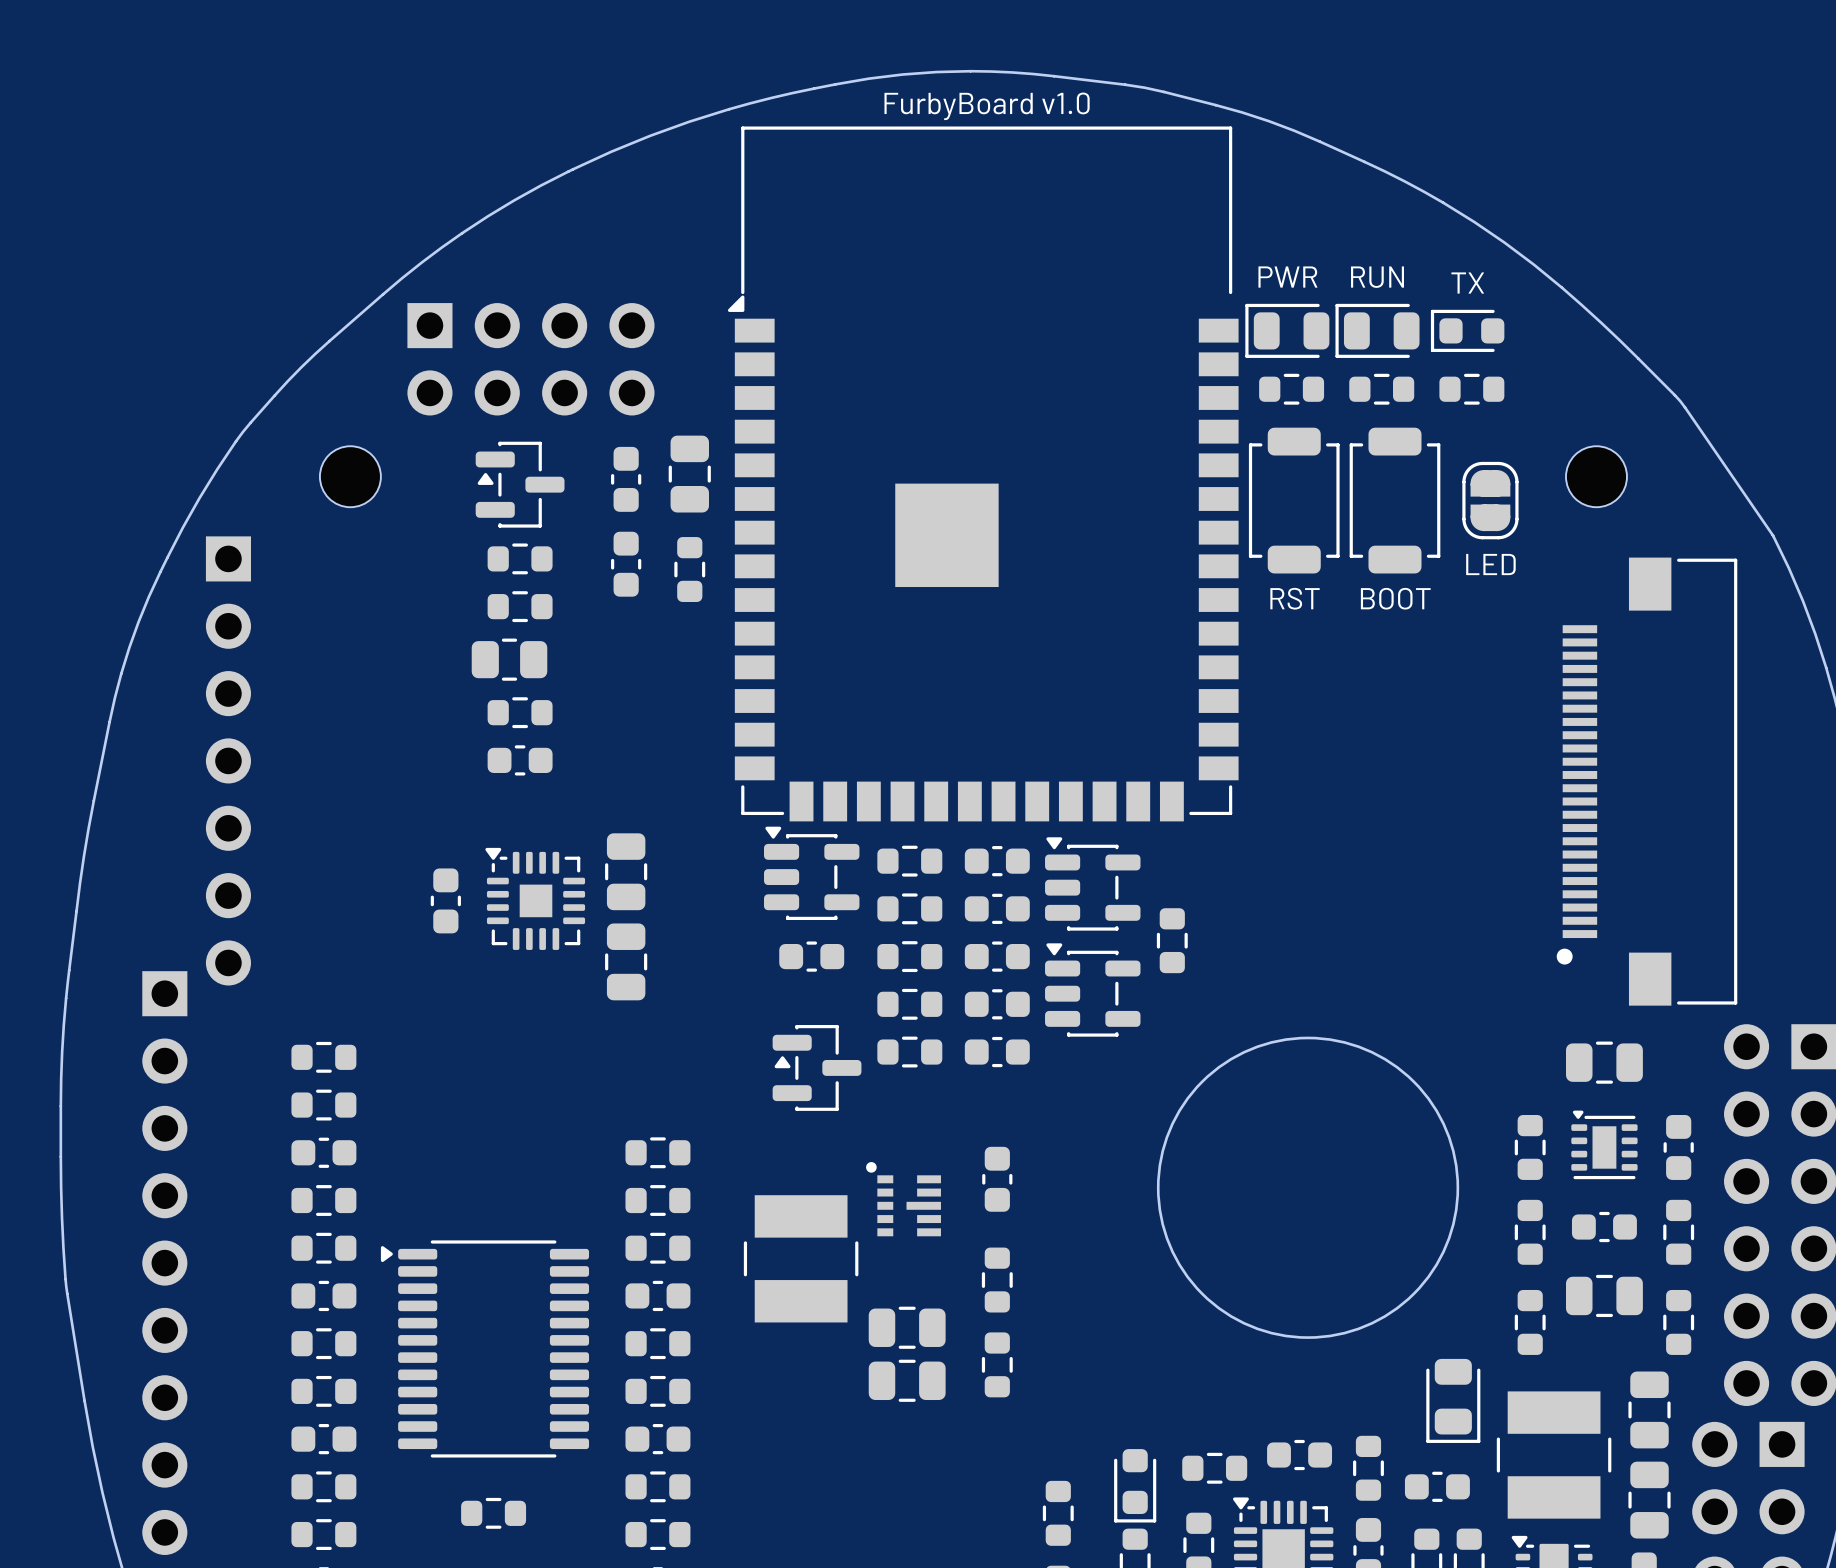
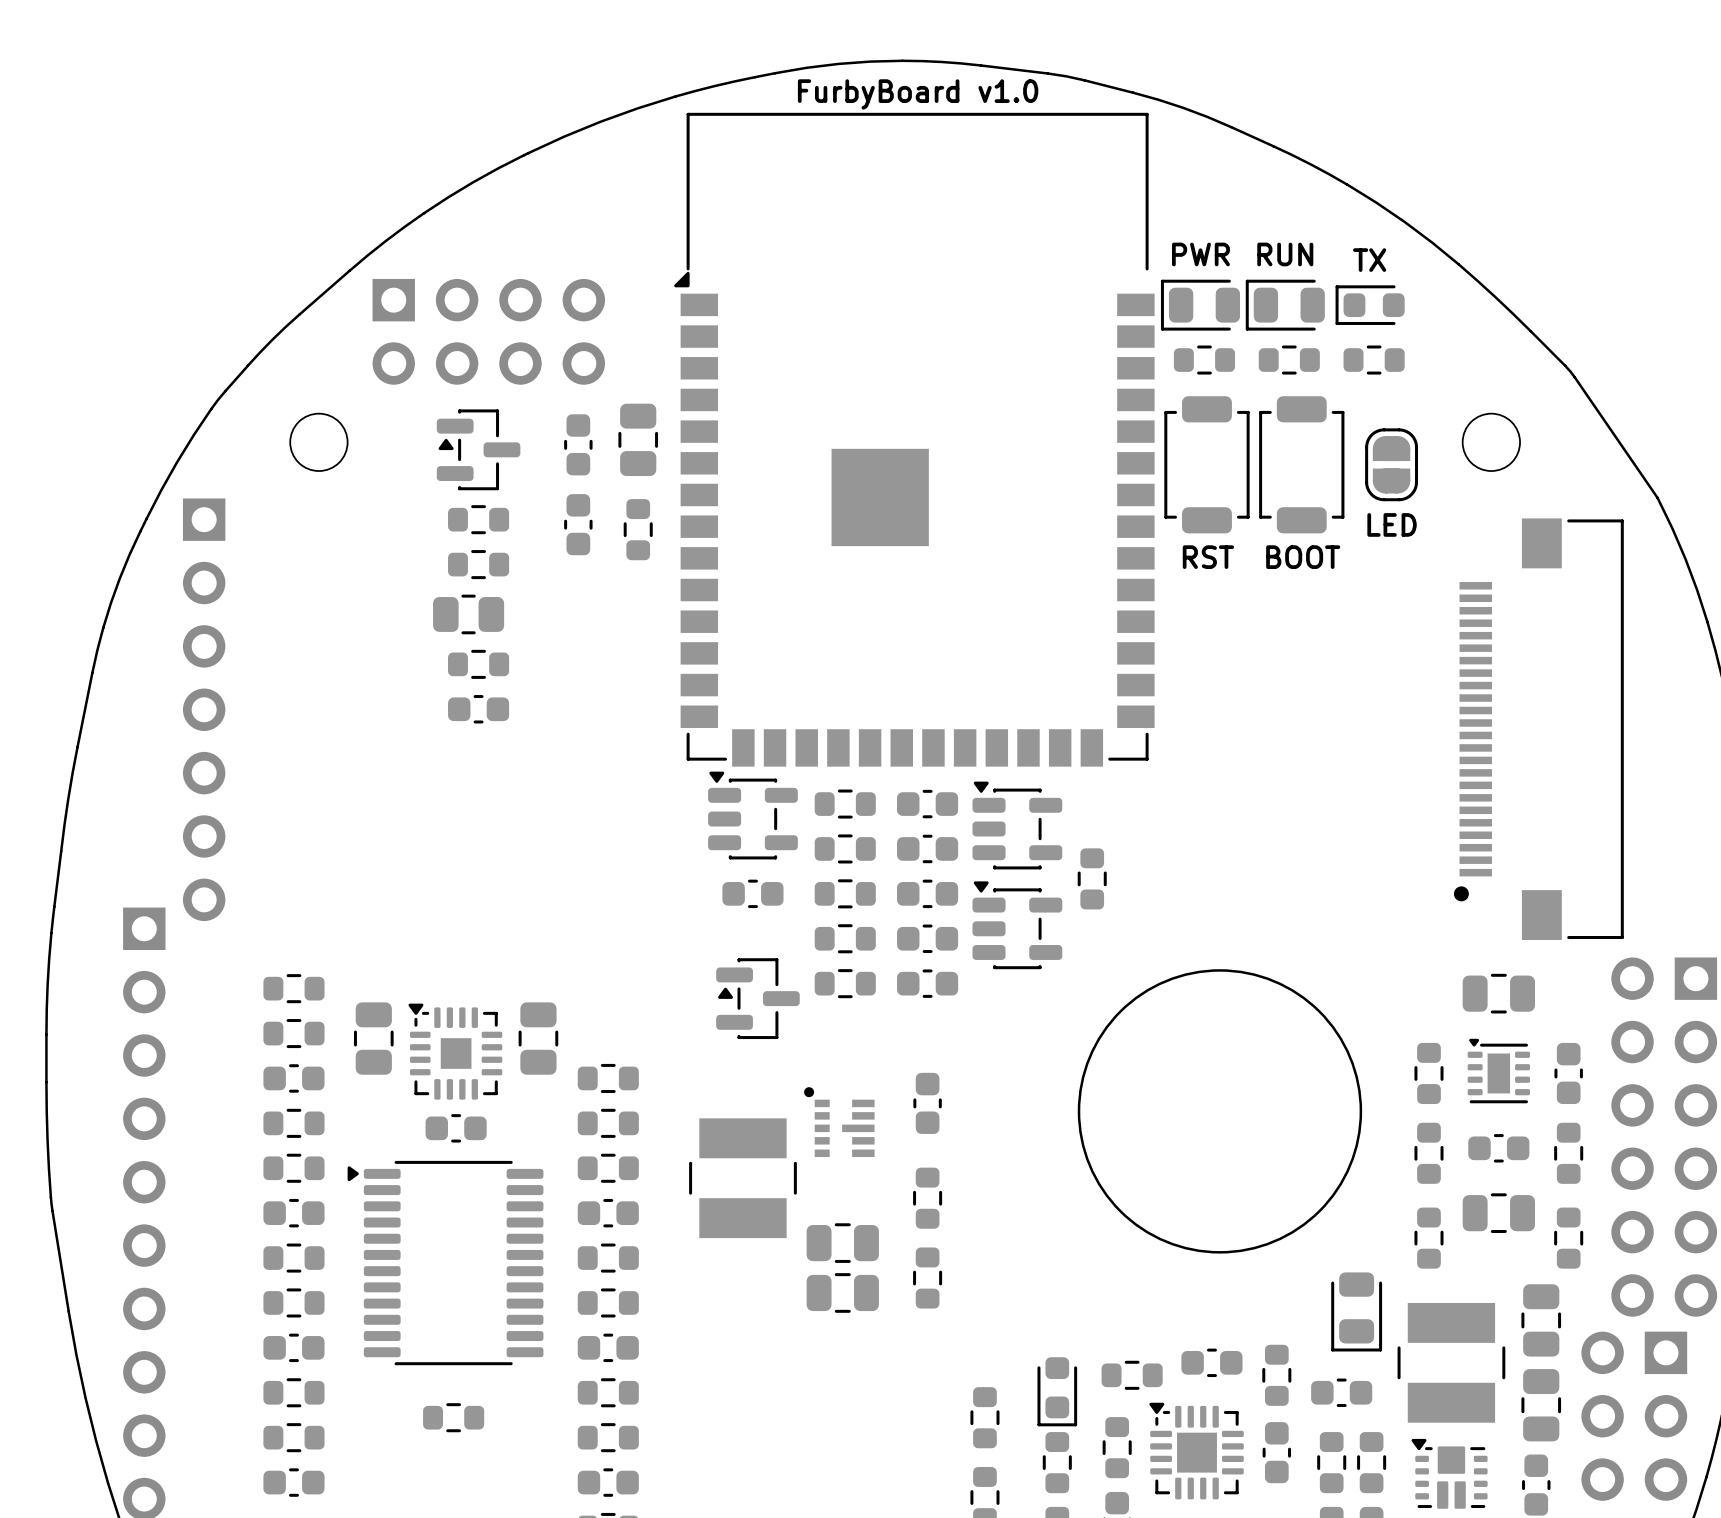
part: (626, 871) -> none
part position: (535, 898) -> (455, 1051)
part rotation: 0° (445, 900) -> 90° clockwise (456, 1128)
part position: (445, 900) -> (456, 1128)
part: (626, 961) -> none
part: none -> (373, 1038)
part: none -> (538, 1038)

